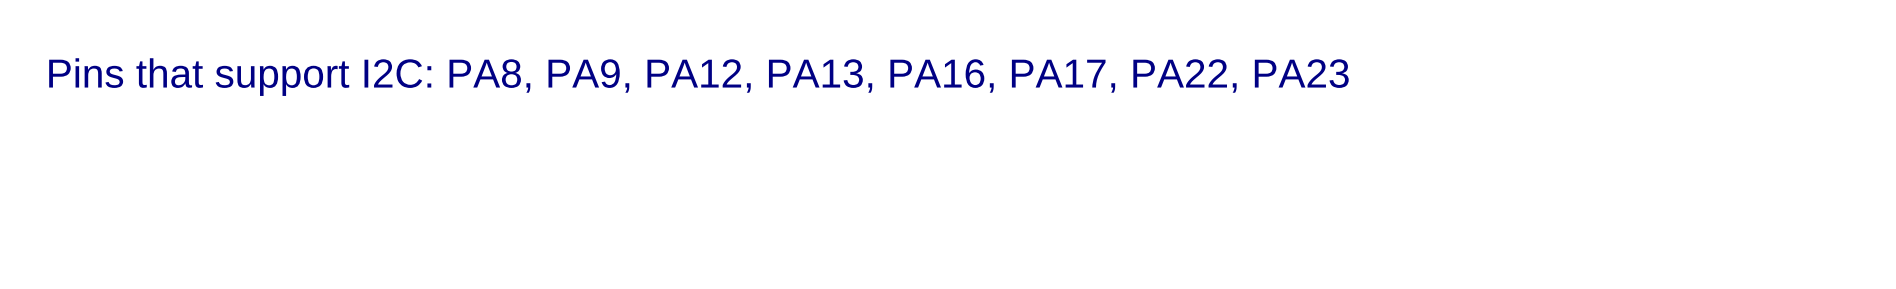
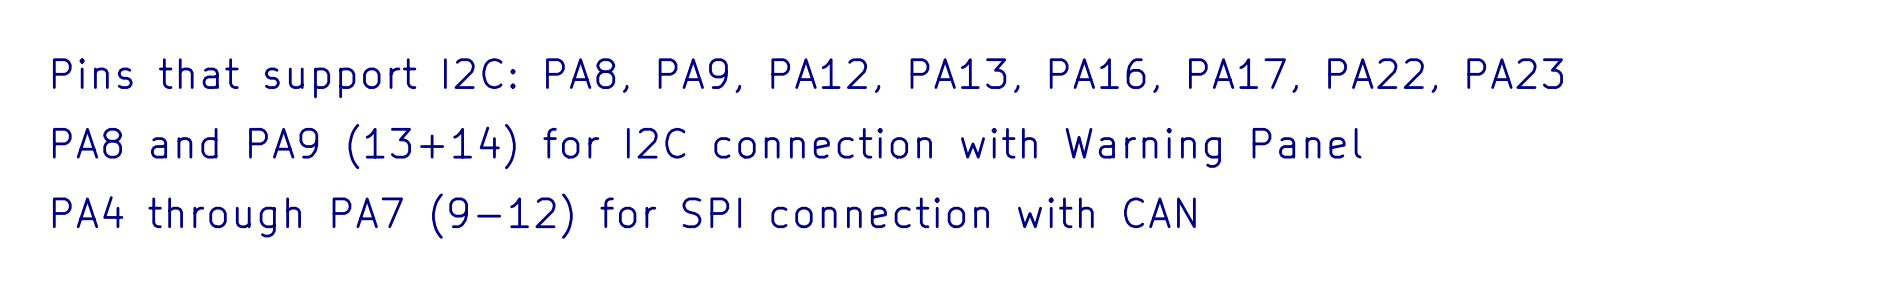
text: none -> PA8 and PA9 (13+14) for I2C connection with Warning Panel (707, 146)
text: none -> PA4 through PA7 (9-12) for SPI connection with CAN (624, 216)

